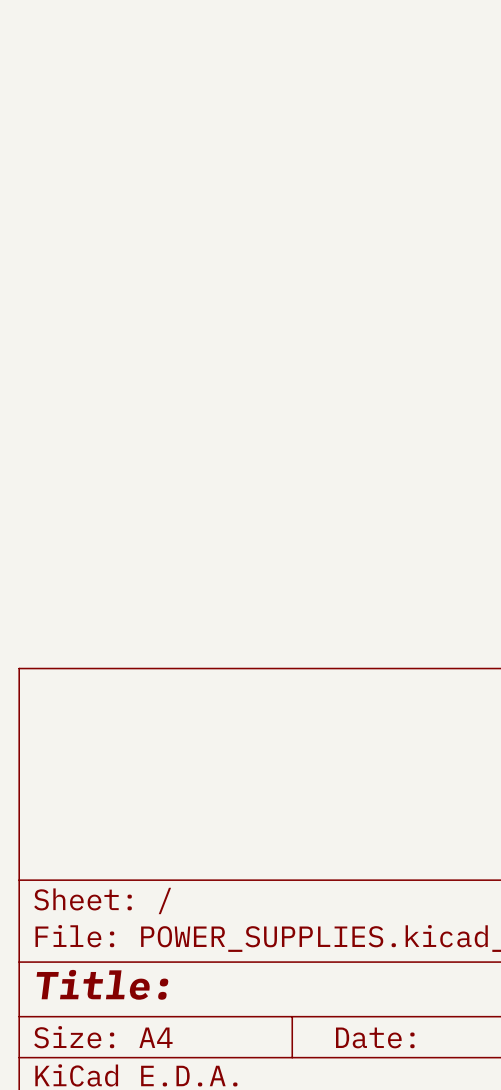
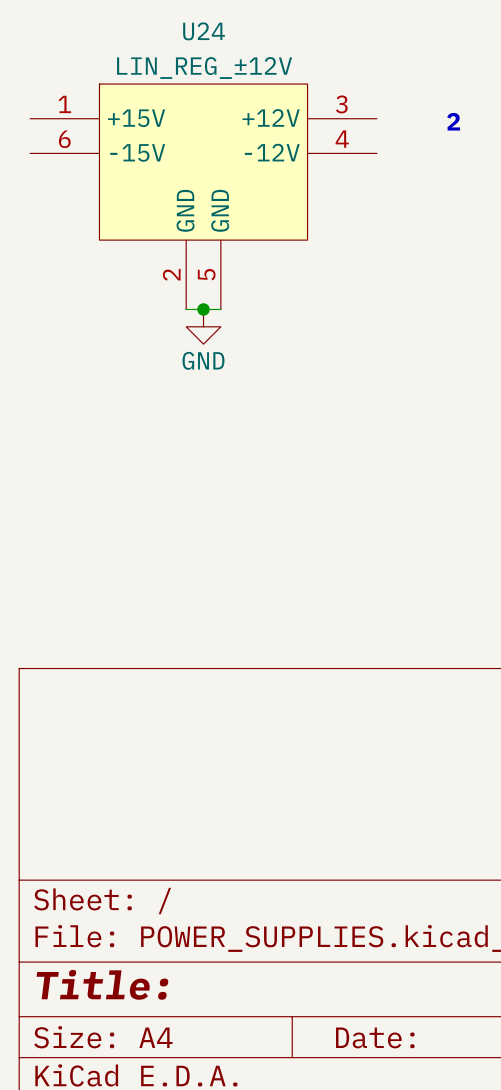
text: none -> 2 (453, 121)
U24: none -> LIN_REG_±12V (203, 196)
wire: none -> (186, 309) (220, 309)
junction: none -> (203, 309)
power symbol: none -> GND (203, 326)

